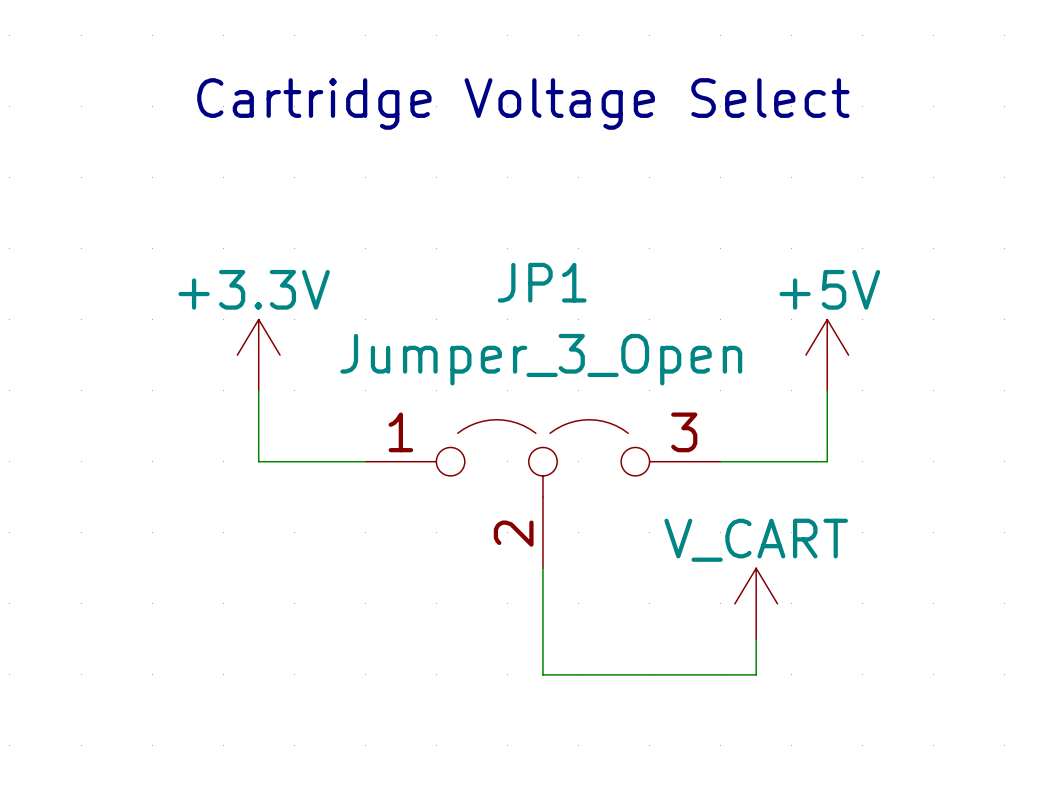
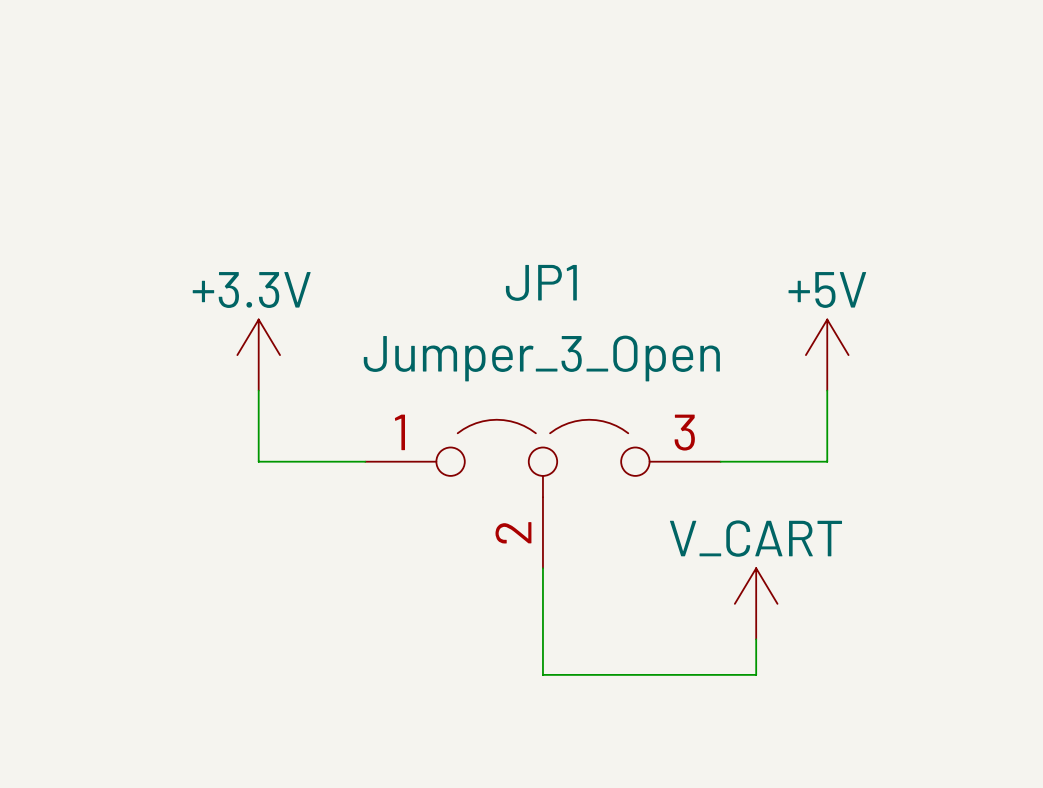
text: Cartridge Voltage Select (523, 103) -> none

